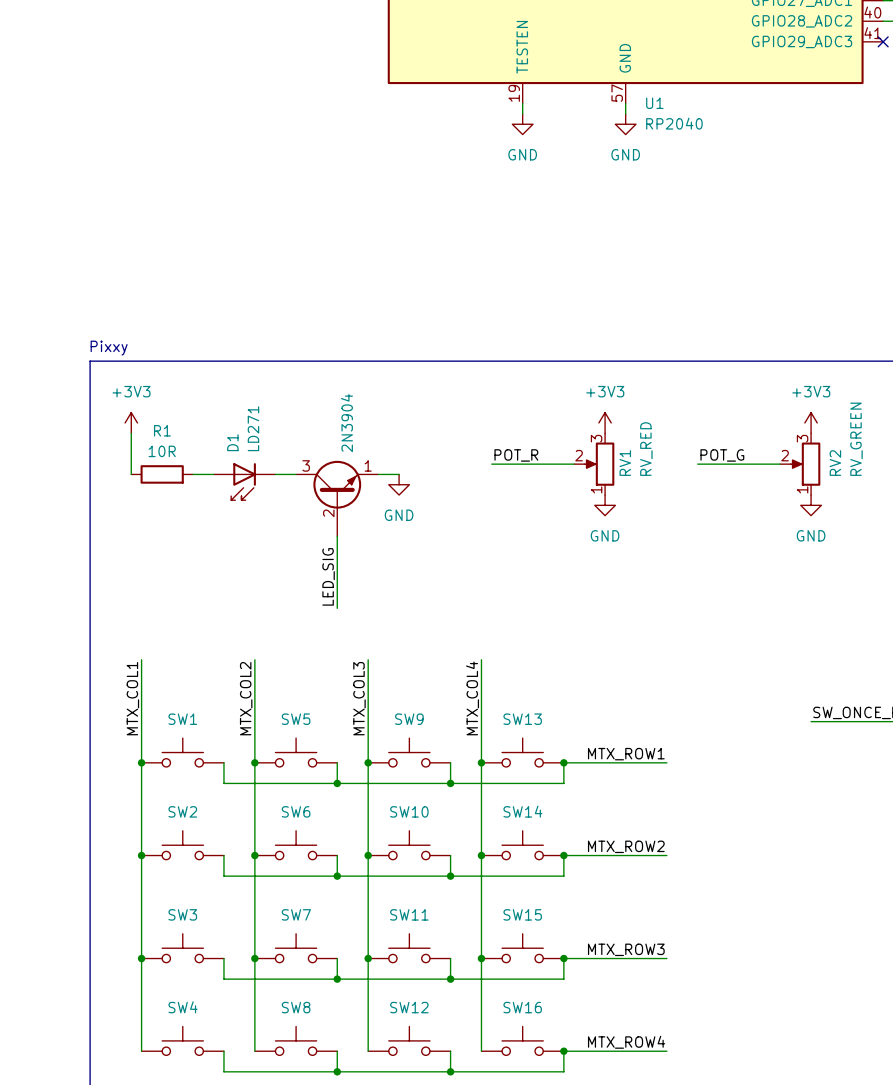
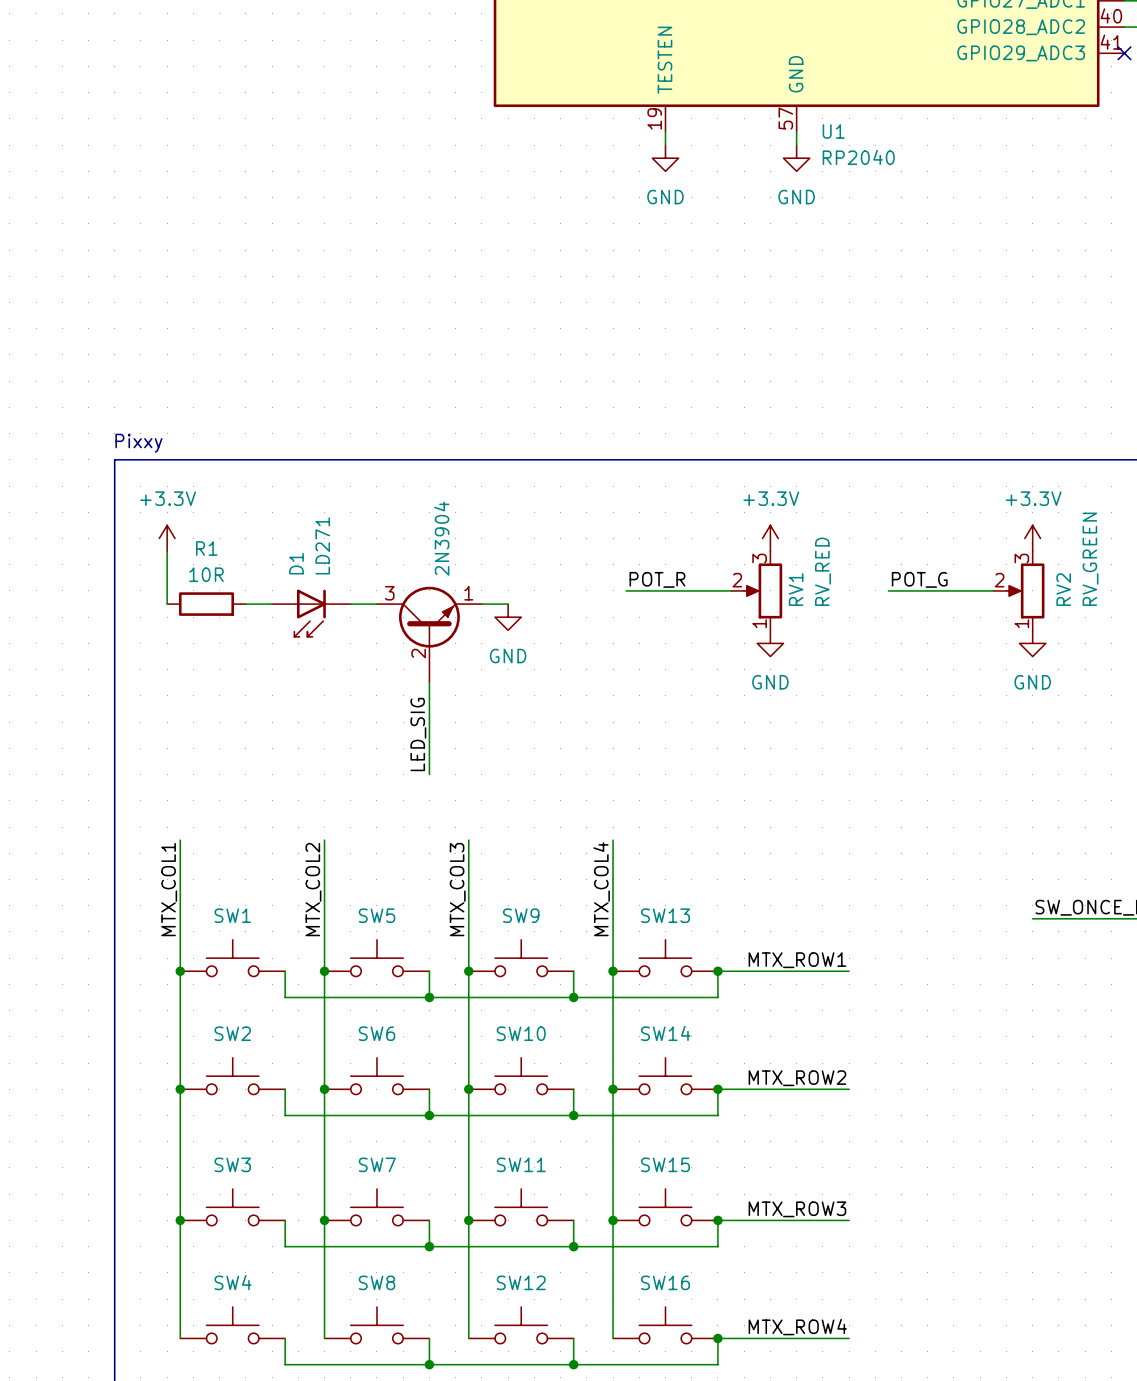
power symbol: +3V3 (131, 422) -> +3.3V (167, 538)
power symbol: +3V3 (605, 422) -> +3.3V (770, 538)
power symbol: +3V3 (811, 422) -> +3.3V (1032, 538)

